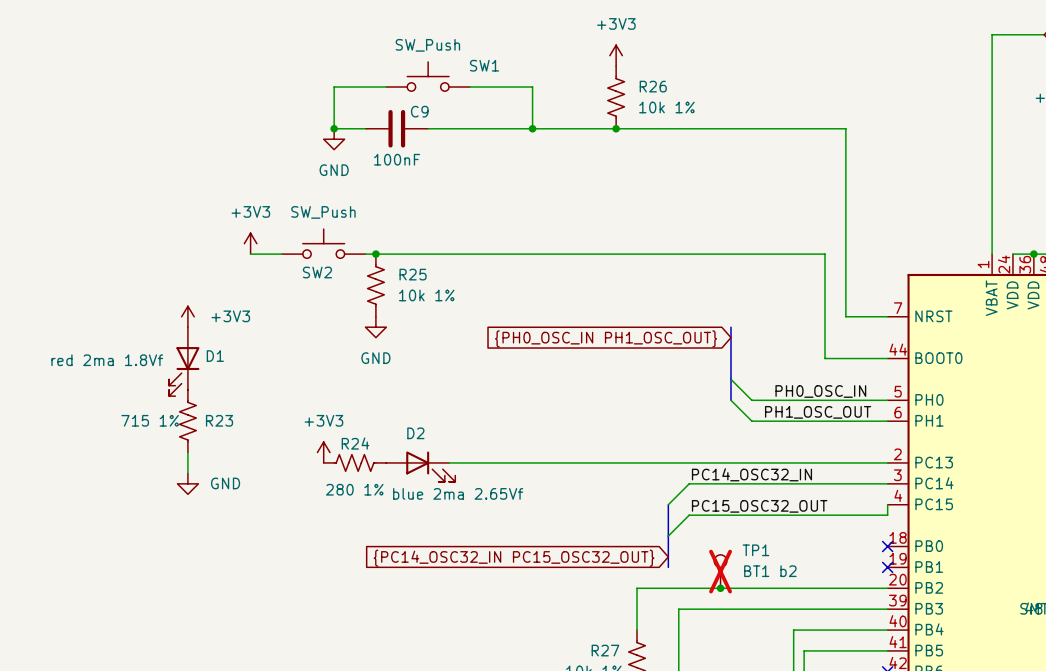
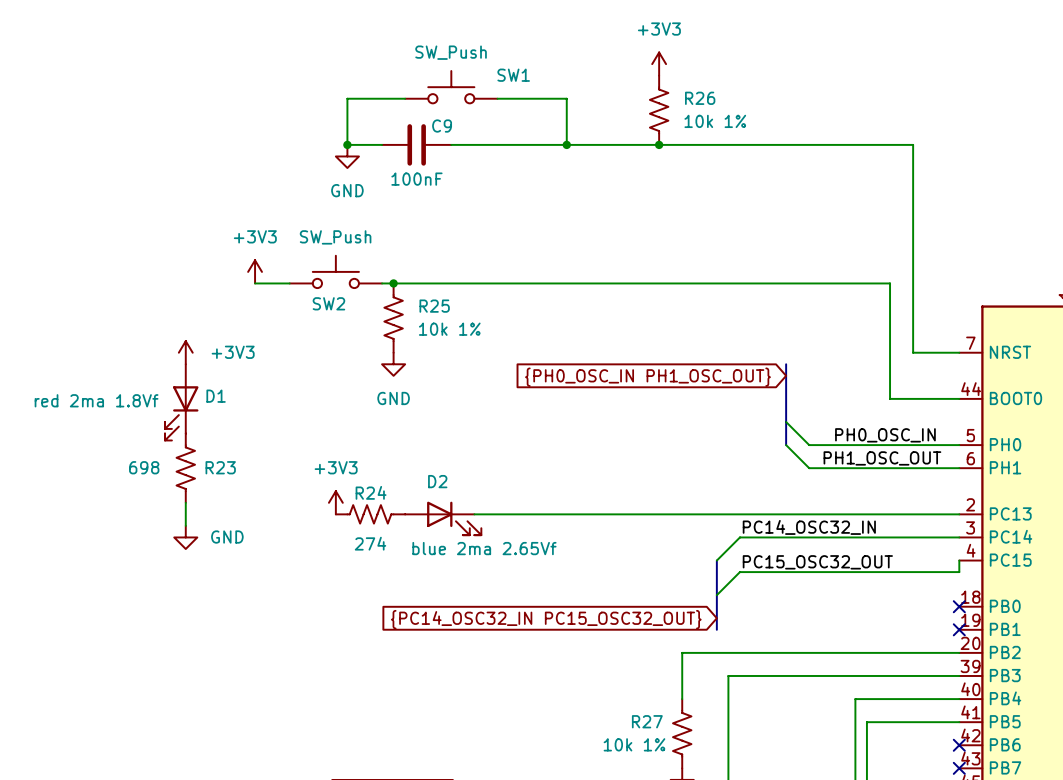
R23 value: 715 1% (150, 420) -> 698 (144, 467)
R24 value: 280 1% (354, 489) -> 274 (370, 543)
TP1: BT1 b2 (720, 571) -> none
junction: (720, 588) -> none

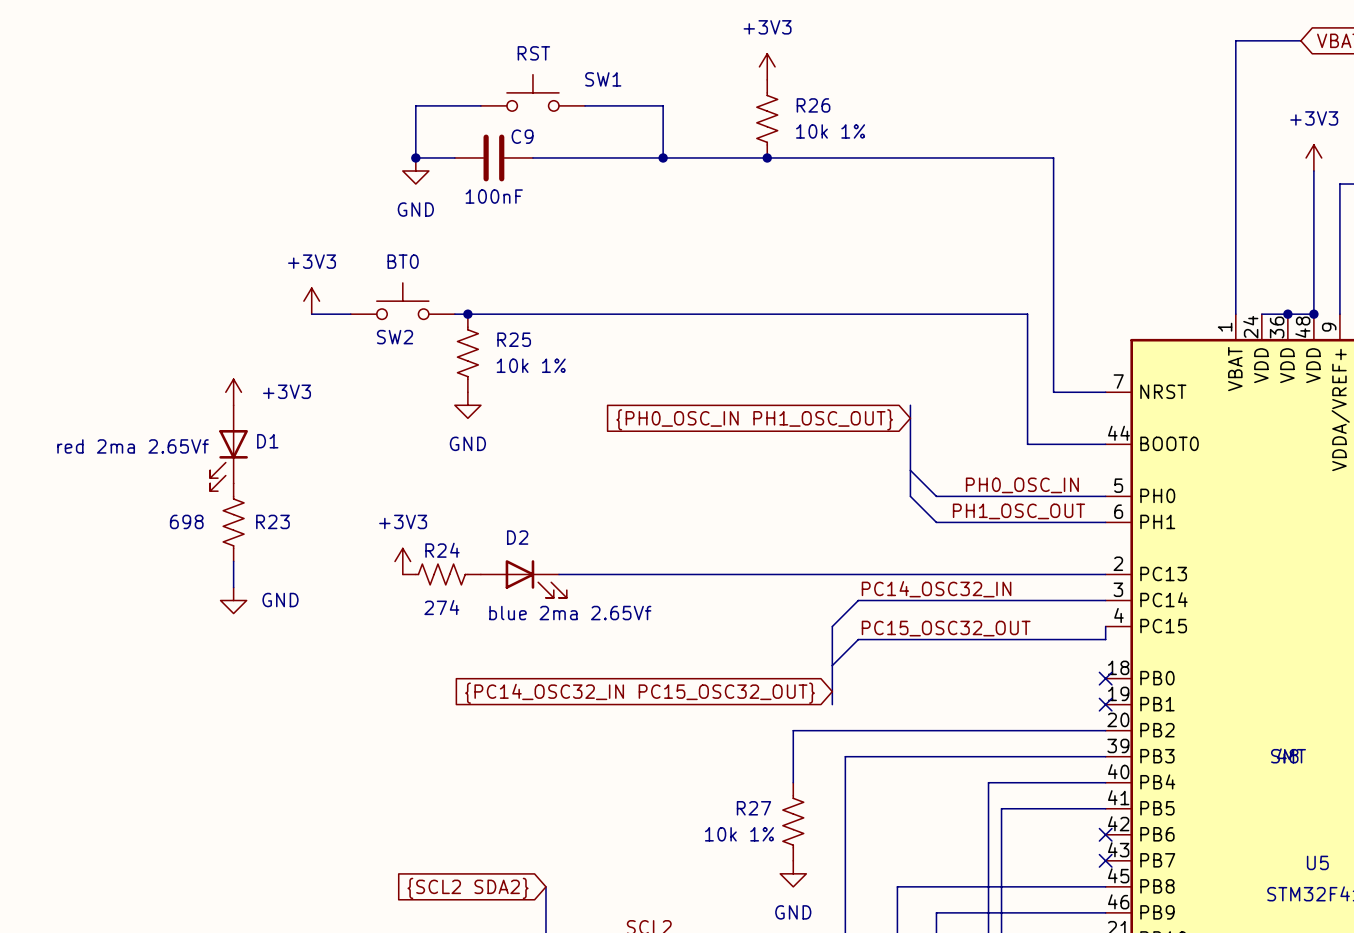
SW1 value: SW_Push (451, 52) -> RST (533, 53)
SW2 value: SW_Push (335, 237) -> BT0 (403, 261)
D1 value: red 2ma 1.8Vf (96, 400) -> red 2ma 2.65Vf (133, 446)

